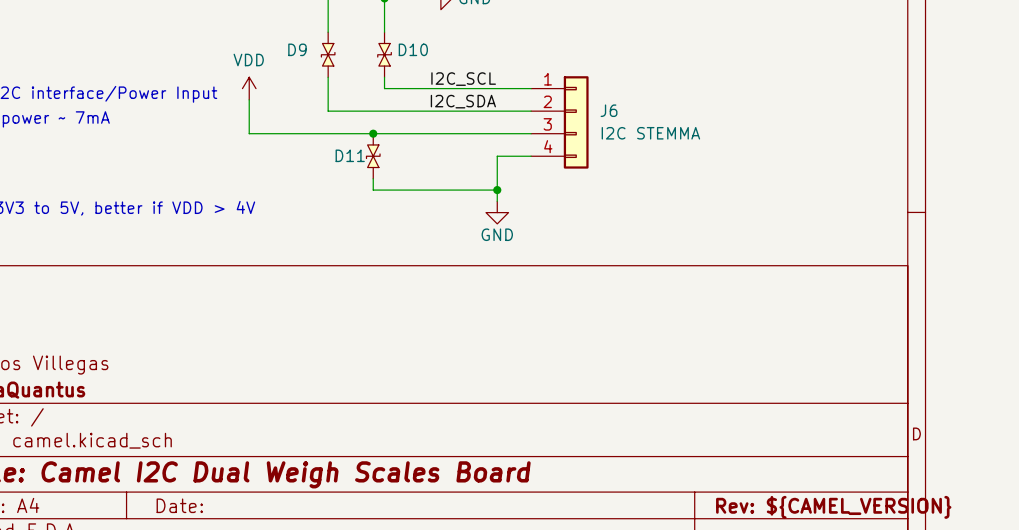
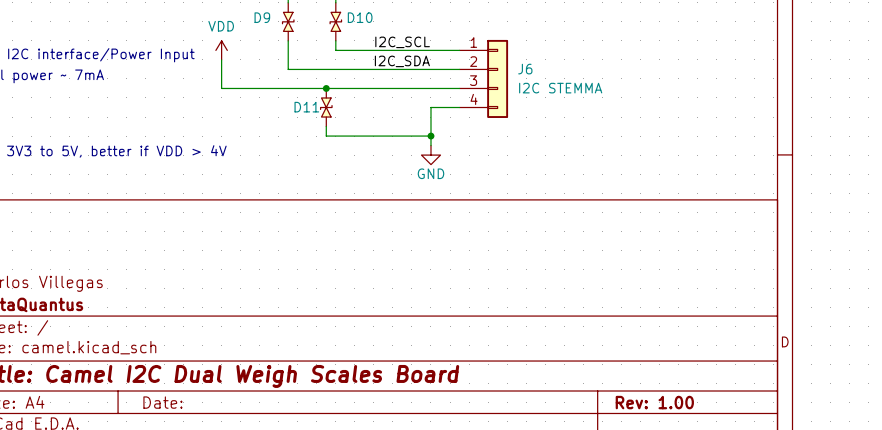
title block: Rev: ${CAMEL_VERSION} (833, 507) -> Rev: 1.00 (654, 402)

